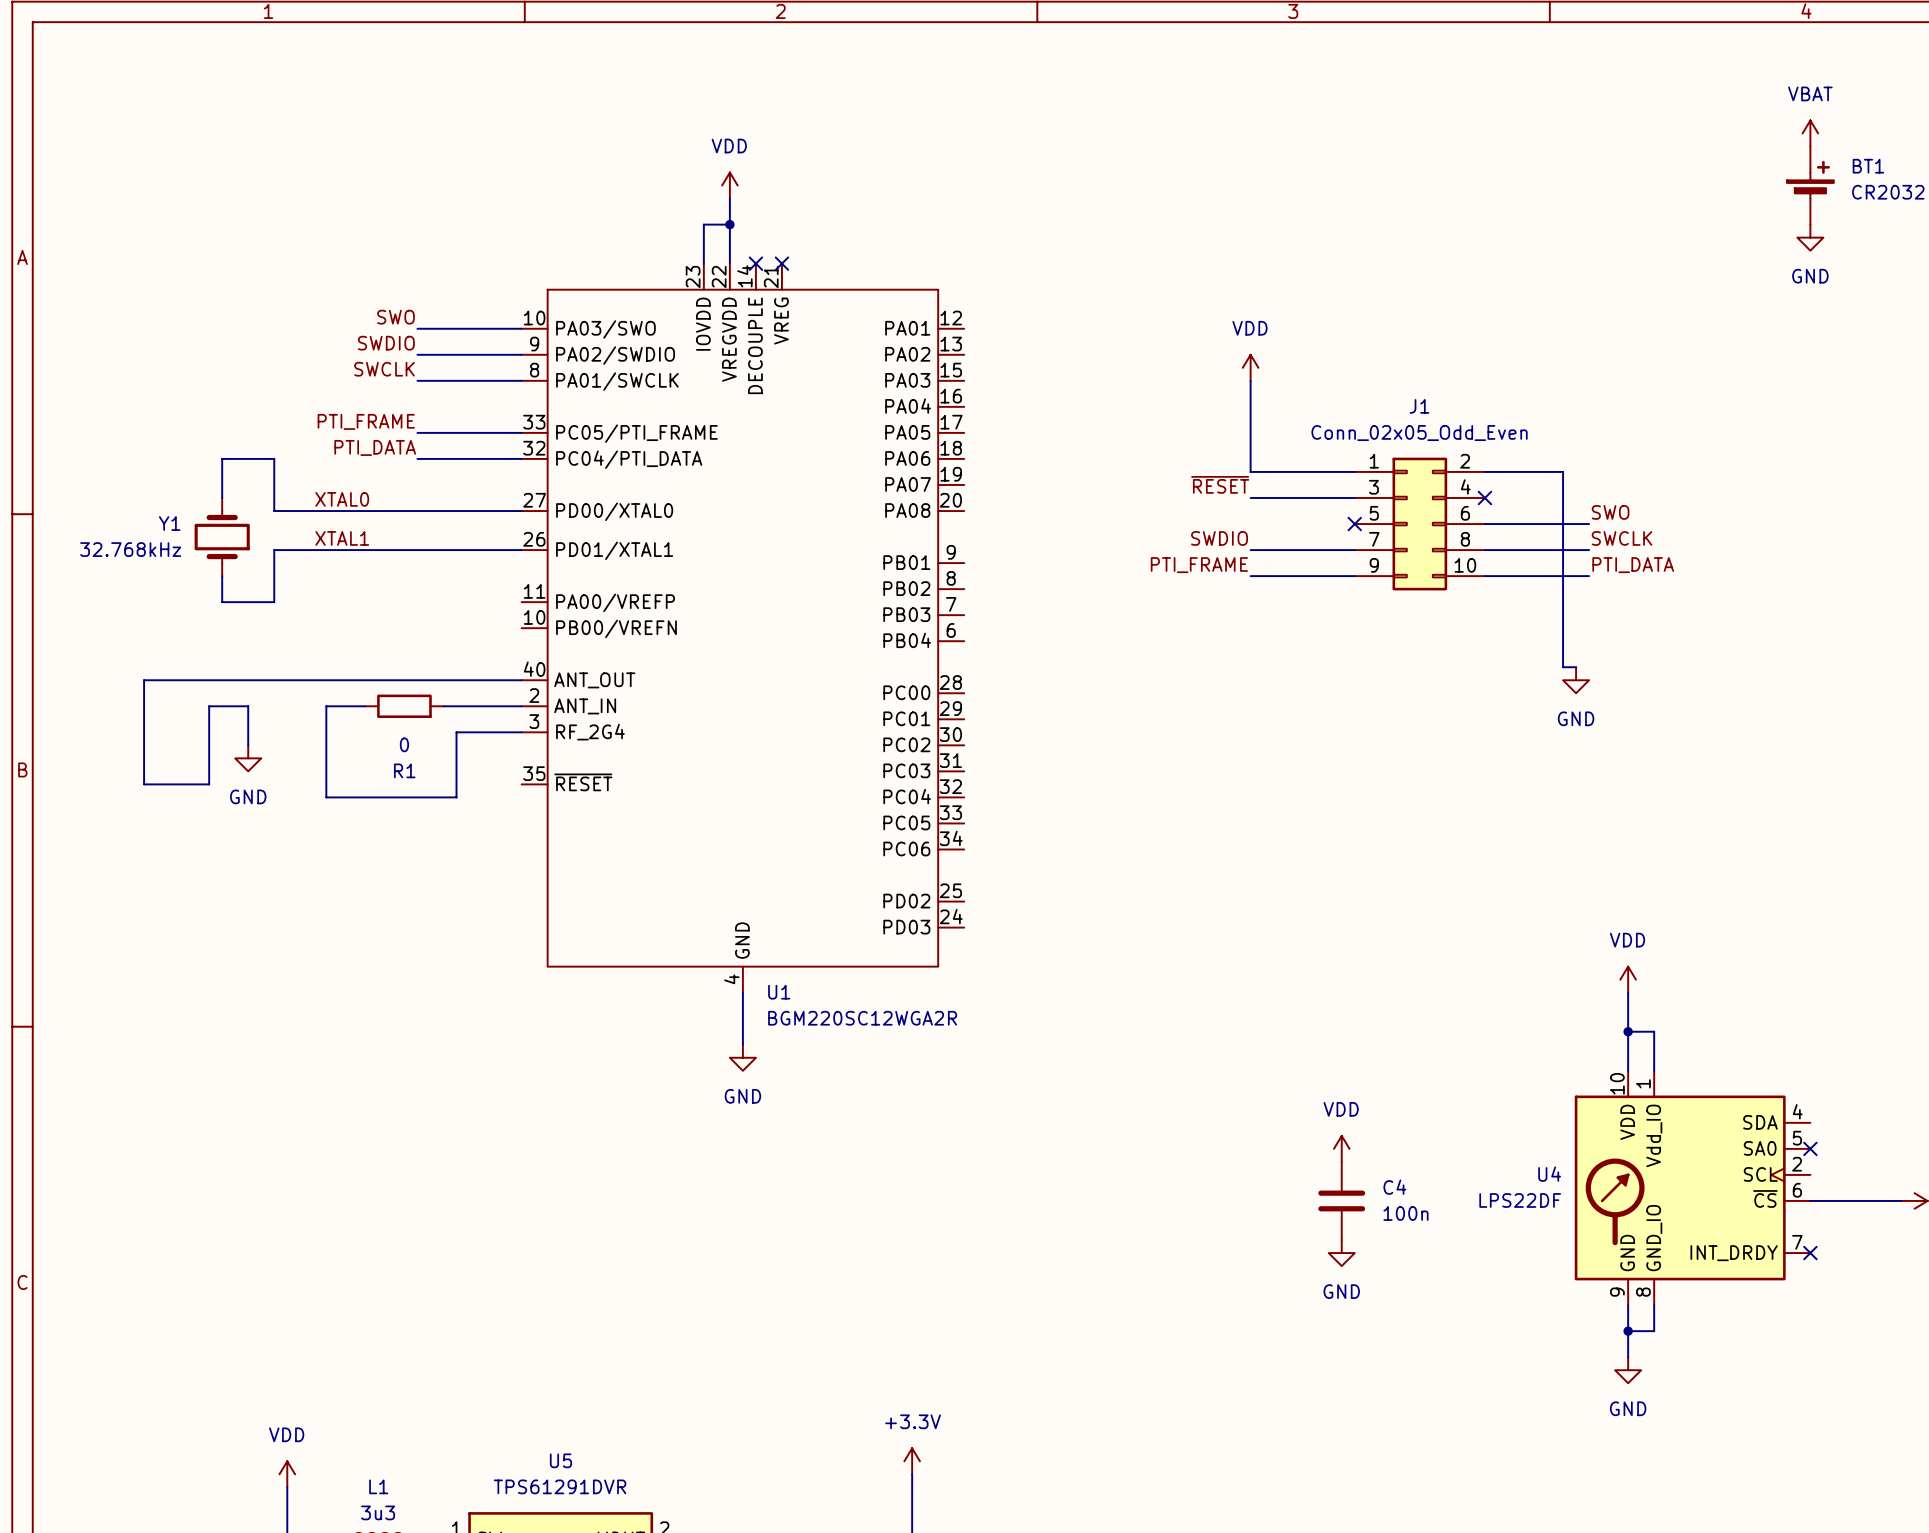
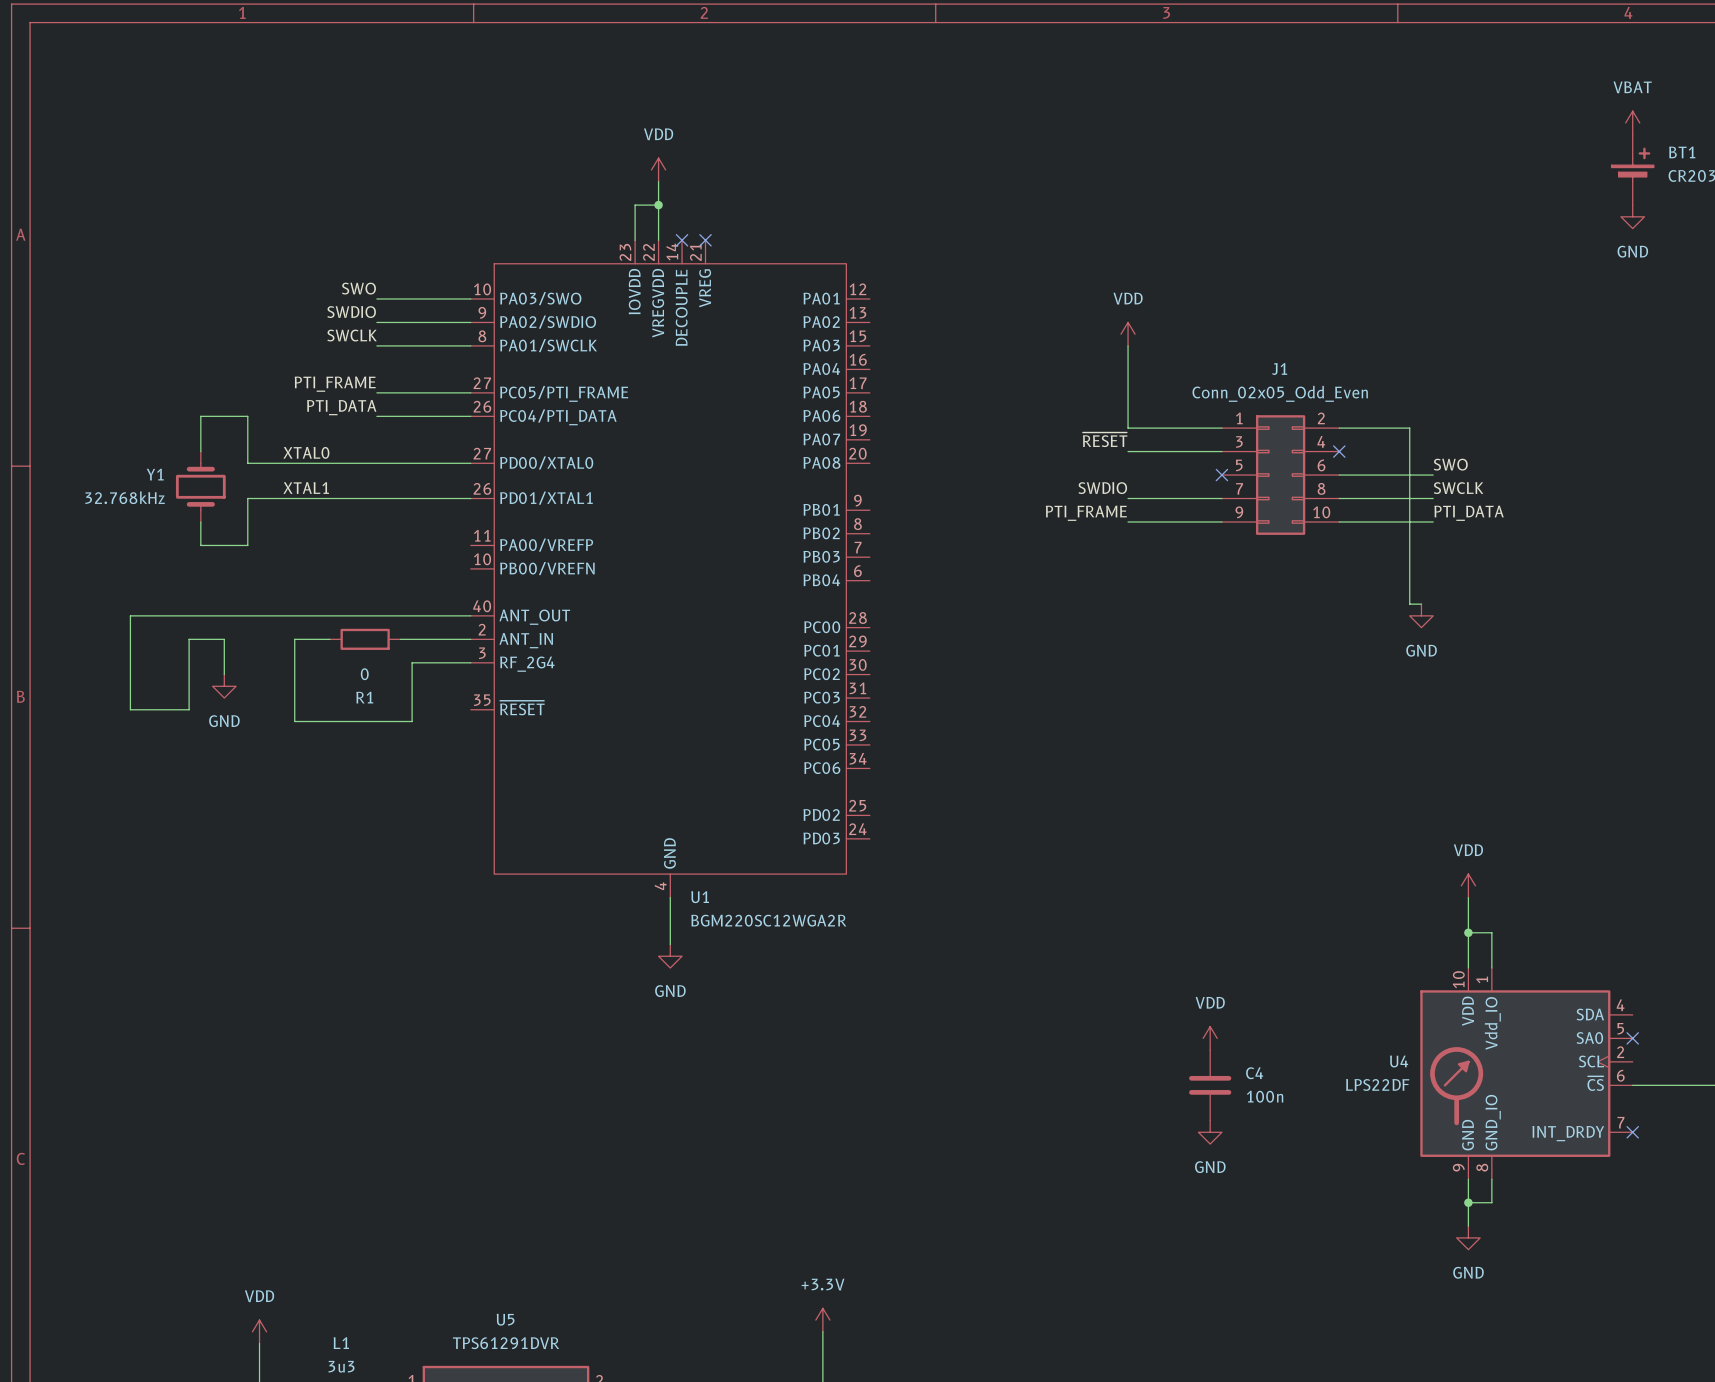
U1 pin number: 33 (534, 422) -> 27 (482, 383)
U1 pin number: 32 (534, 448) -> 26 (482, 406)

